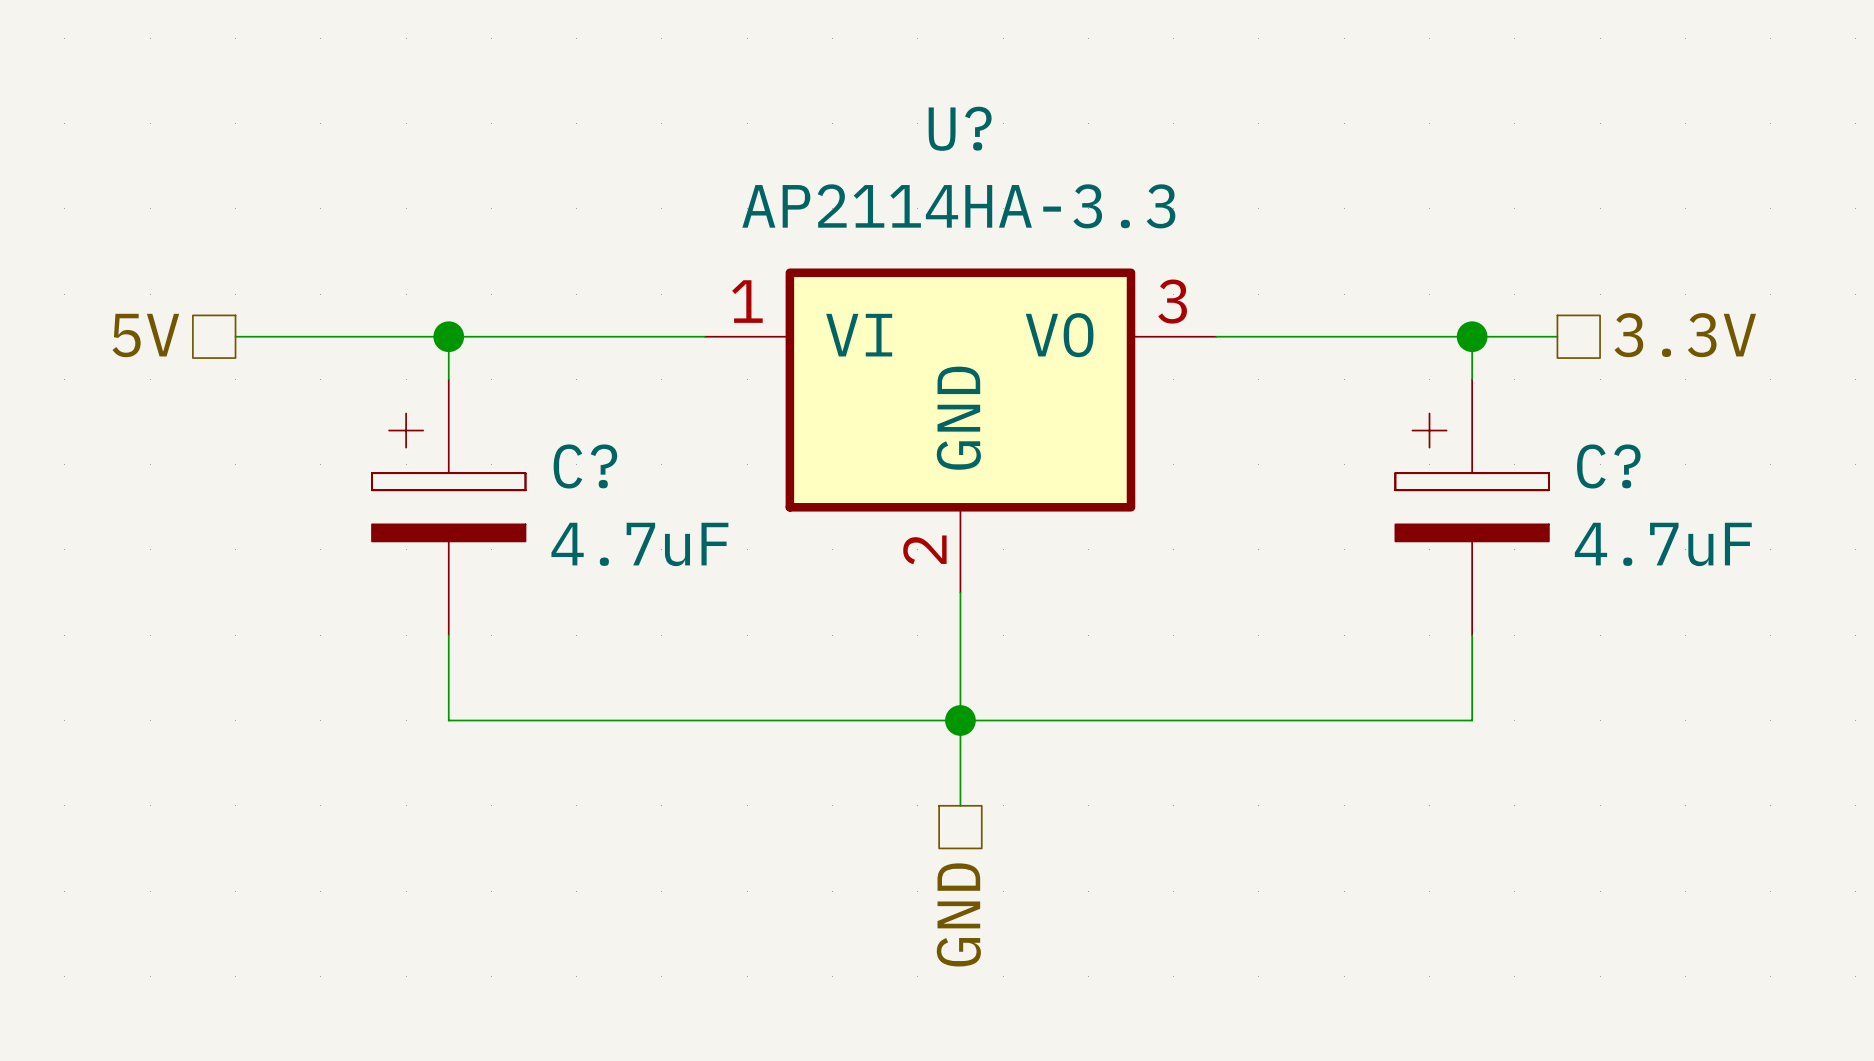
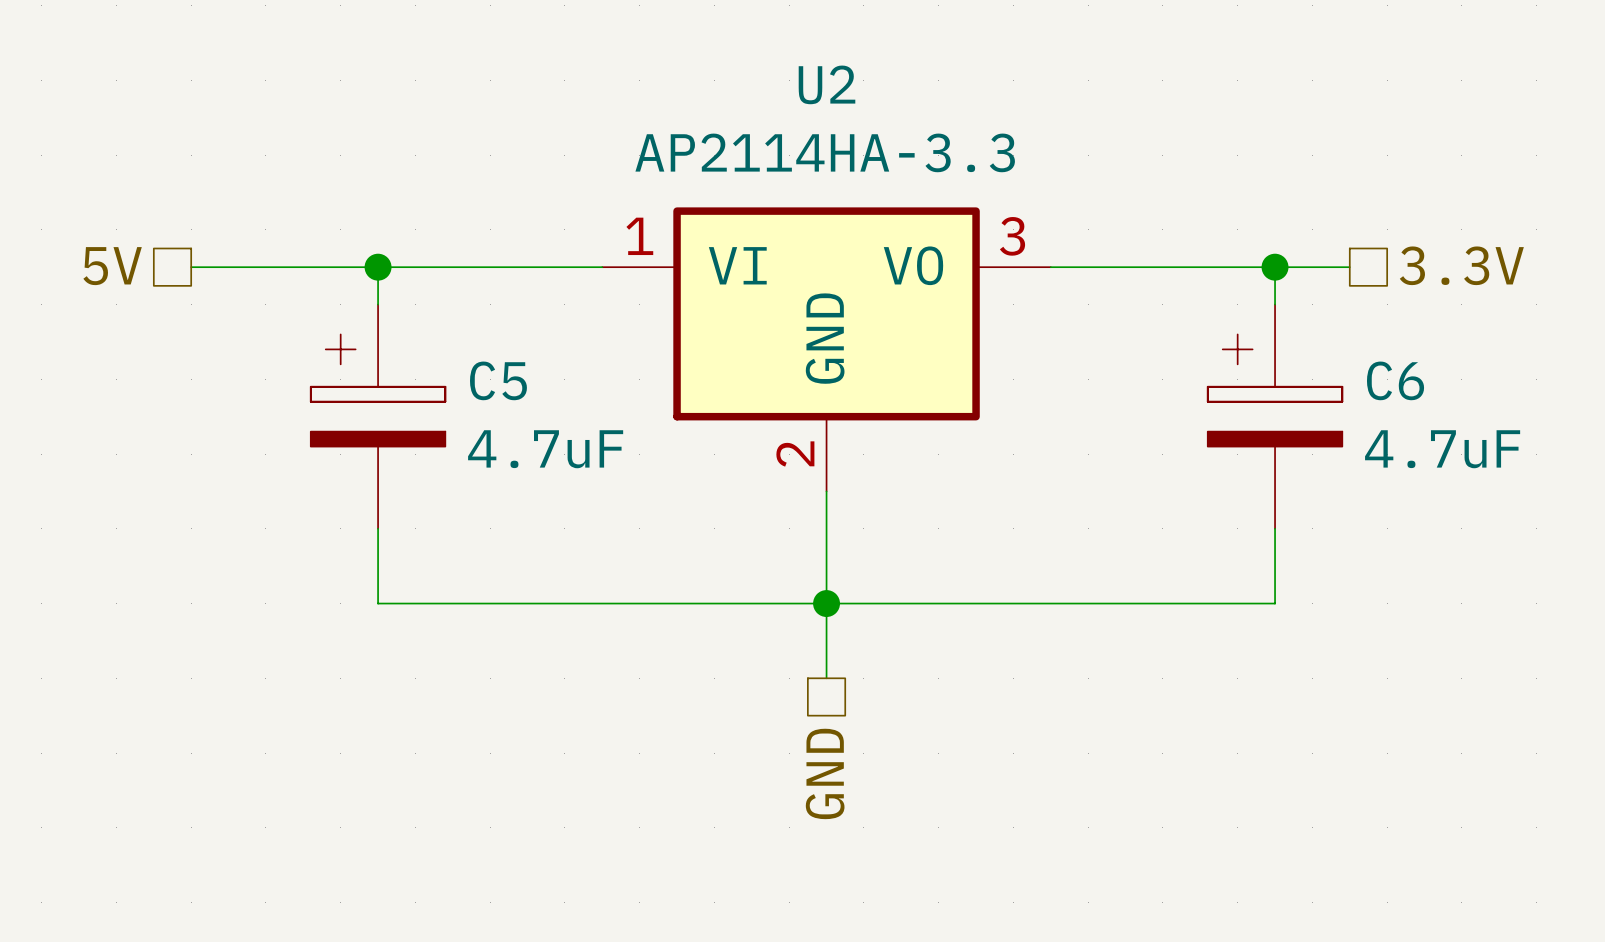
U? name: U? (960, 128) -> U2 (827, 84)
C? name: C? (585, 466) -> C5 (498, 380)
C? name: C? (1608, 466) -> C6 (1395, 380)

